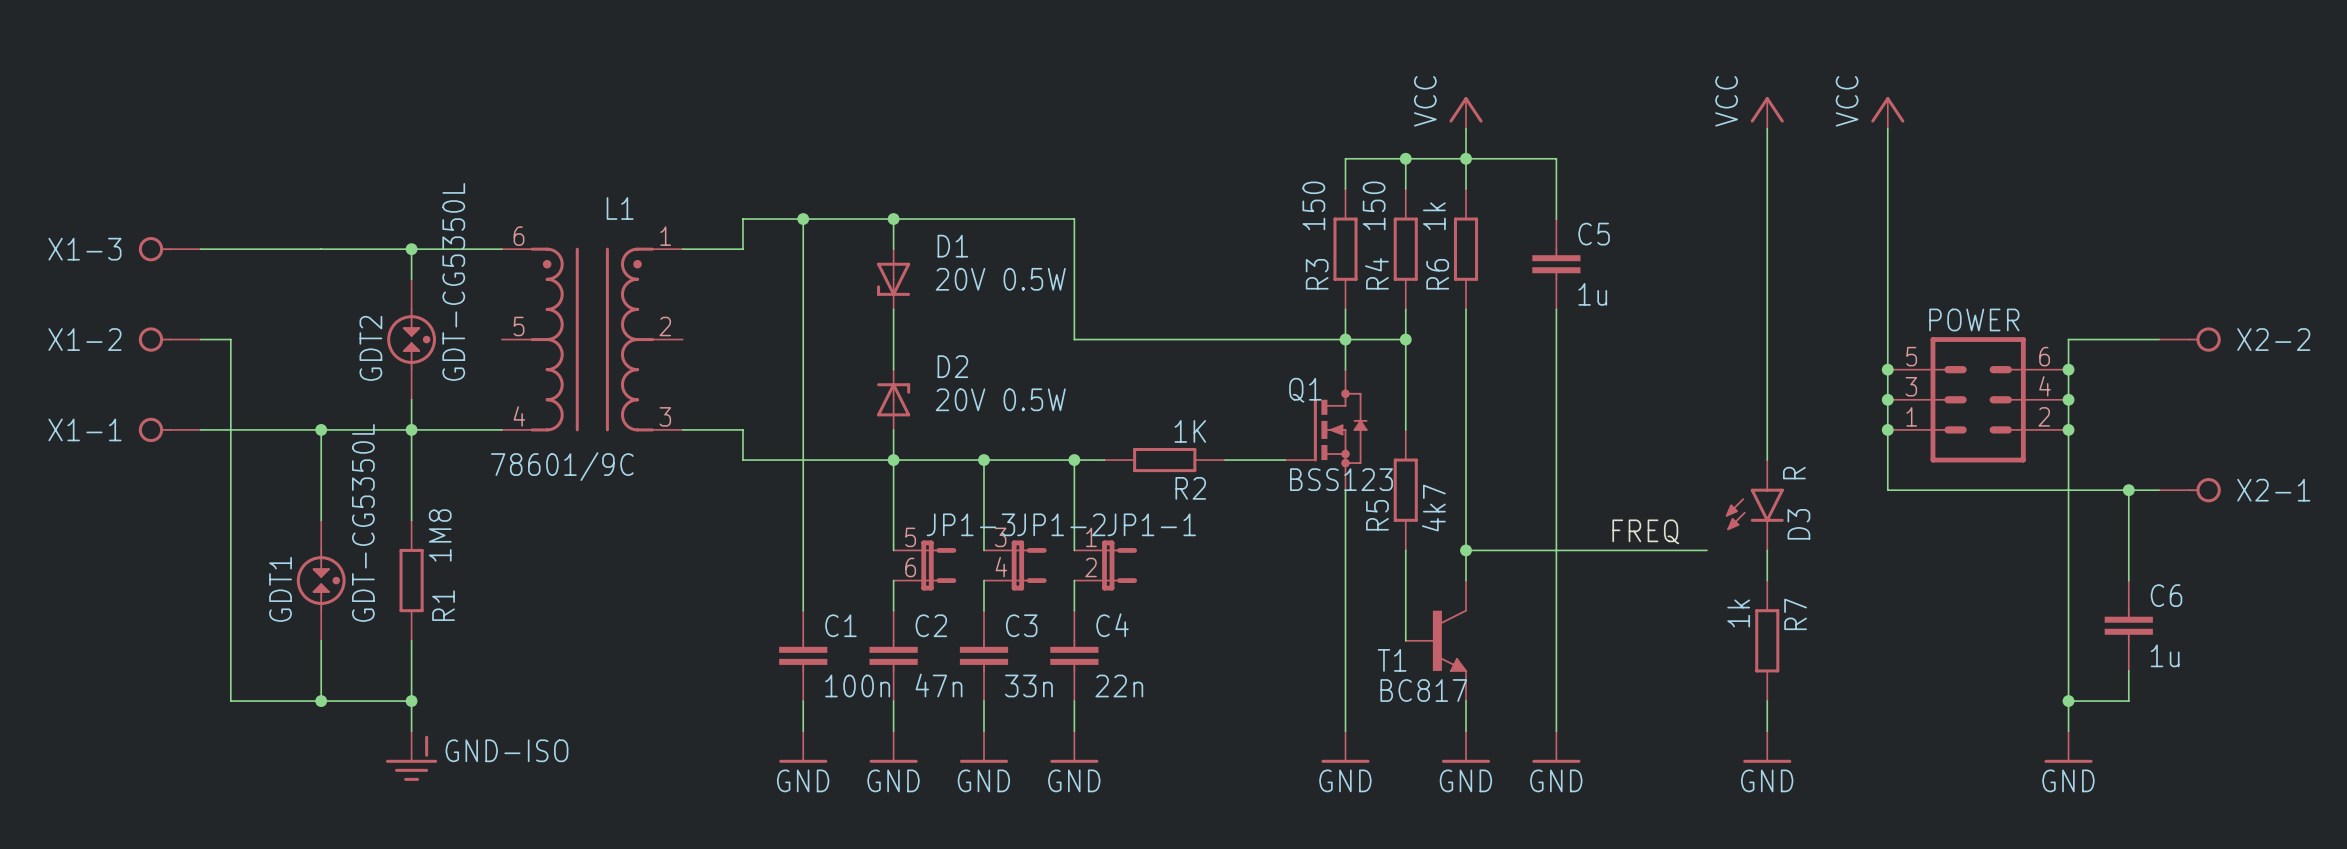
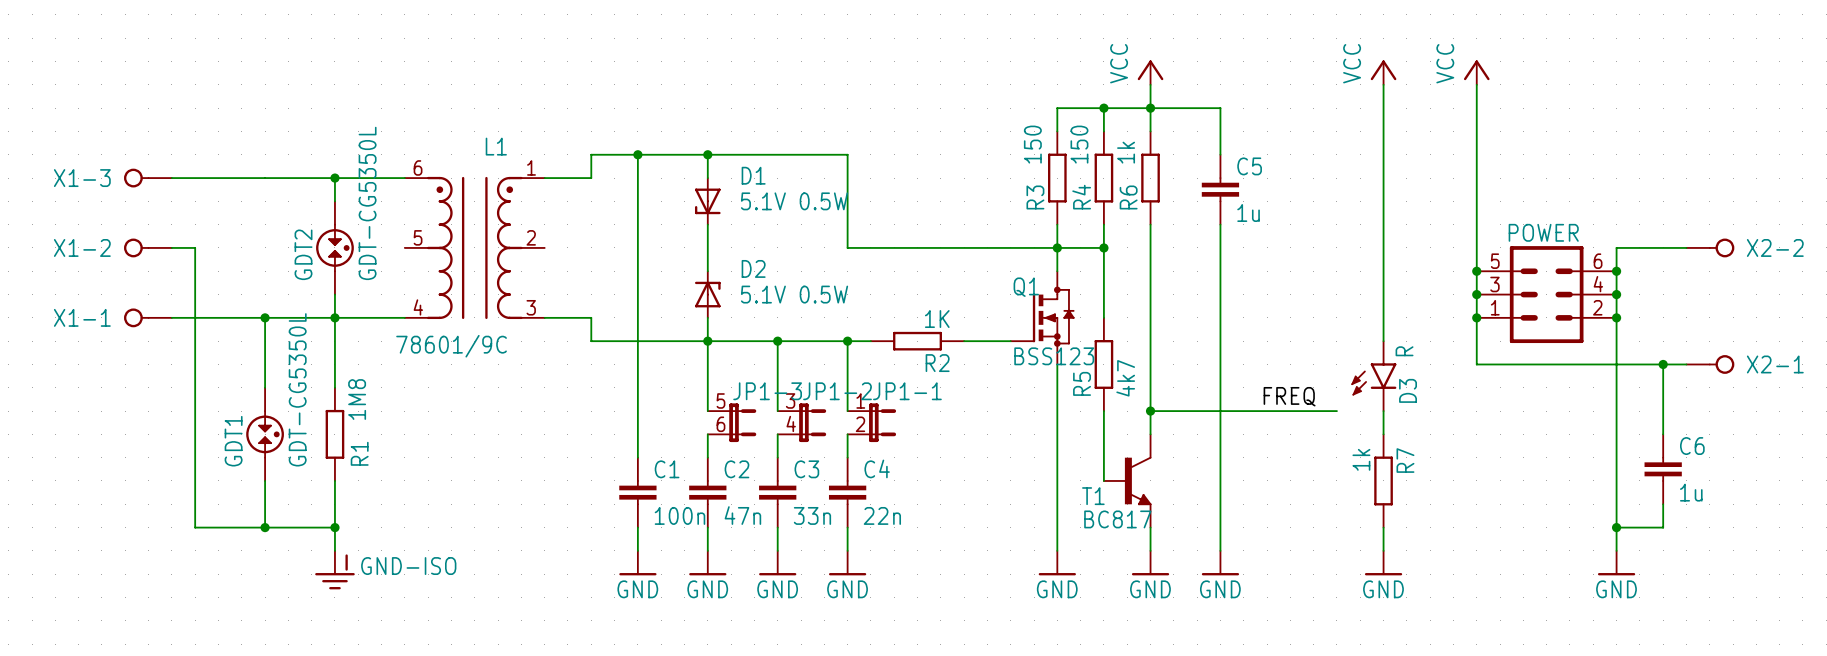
D1 value: 20V 0.5W (1000, 279) -> 5.1V 0.5W (794, 201)
D2 value: 20V 0.5W (1000, 399) -> 5.1V 0.5W (794, 294)

